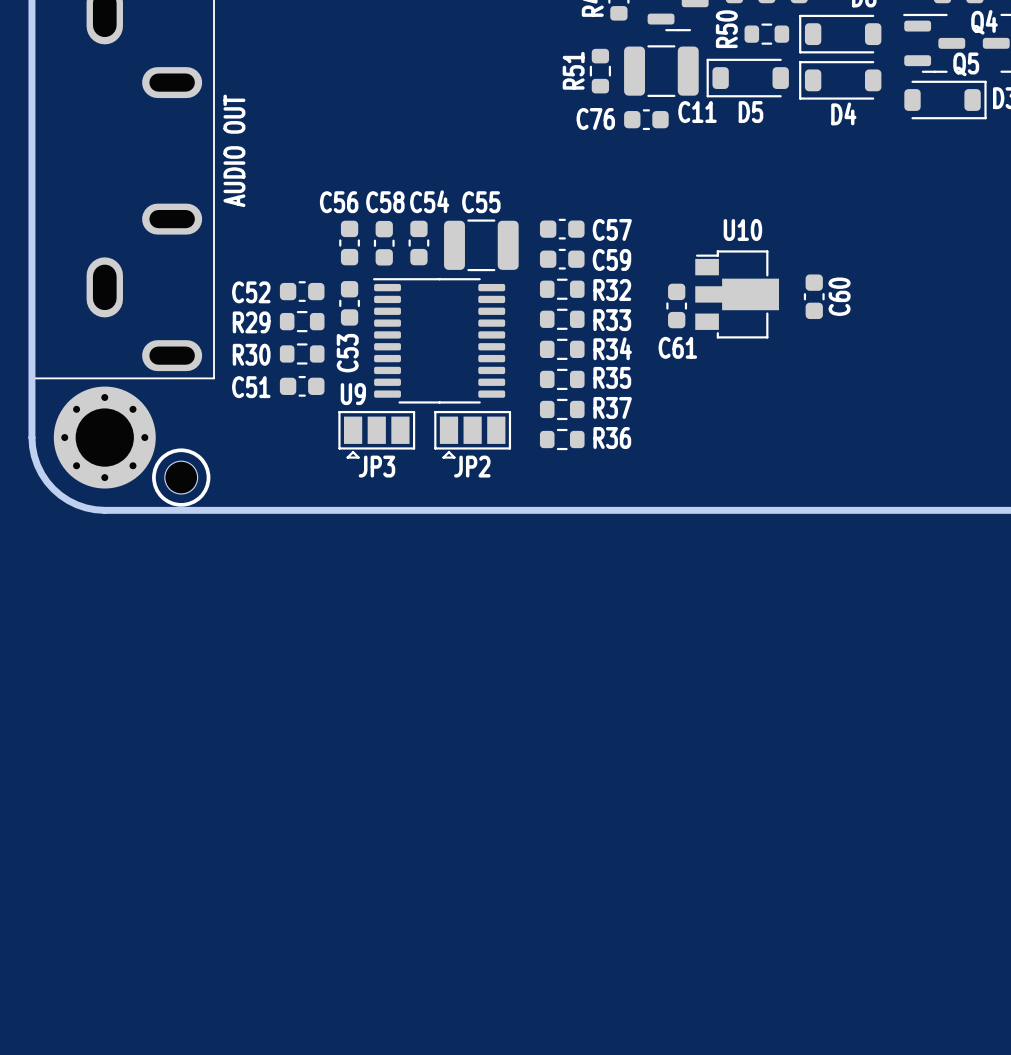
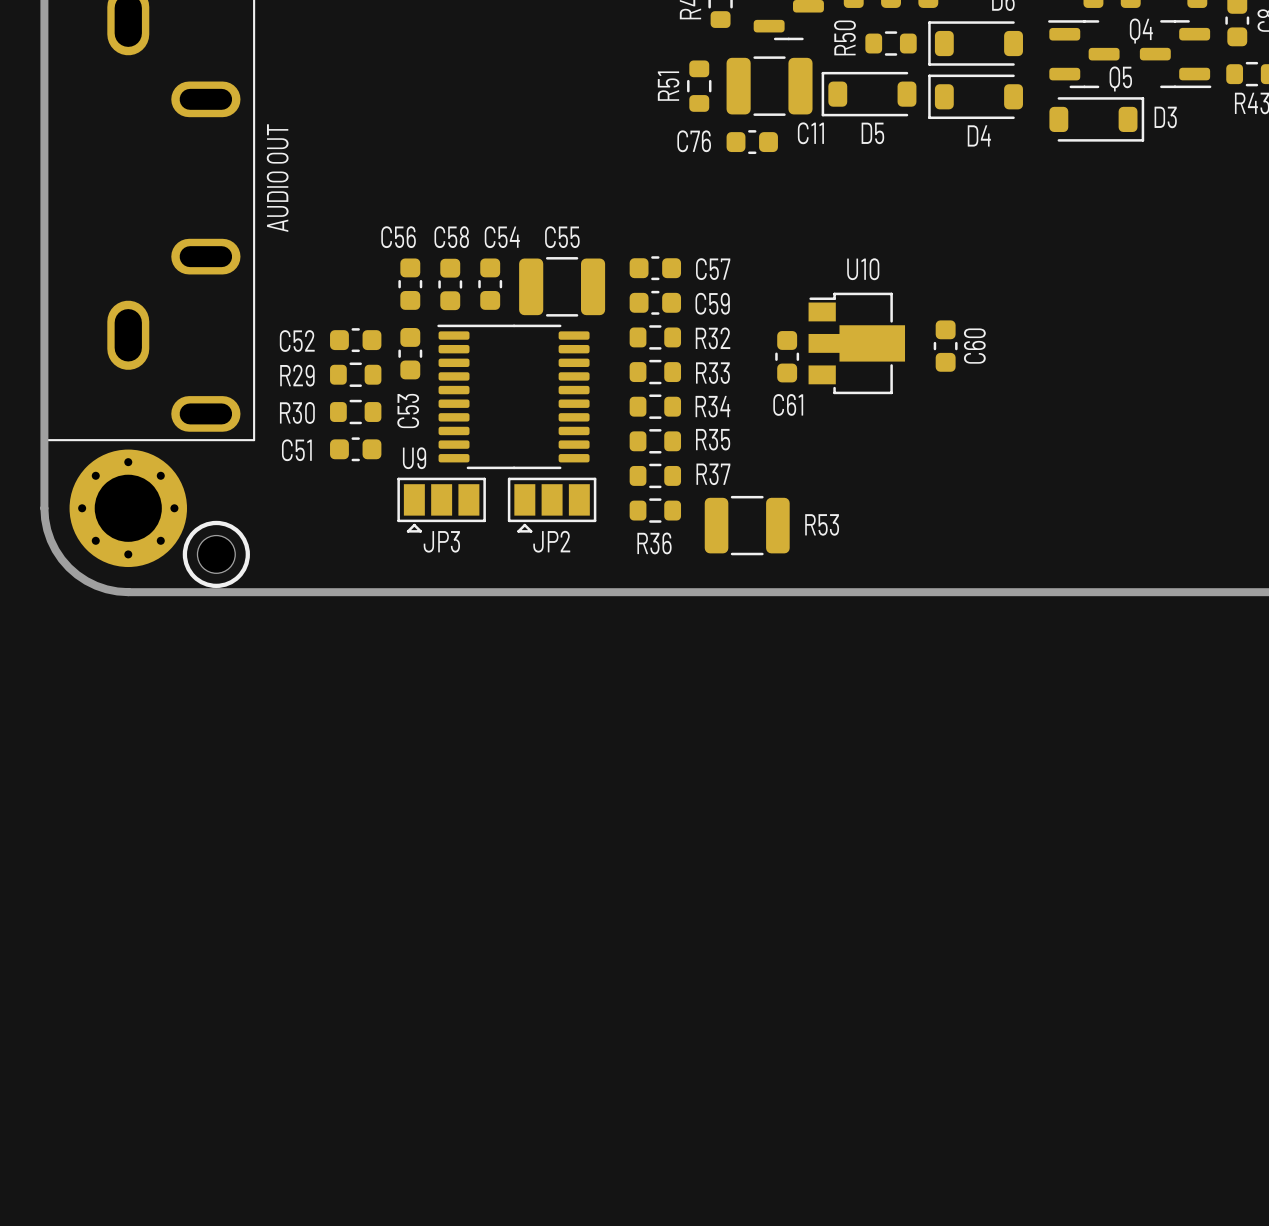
R36 name position: R36 (612, 438) -> R36 (654, 543)
R53: none -> (747, 525)

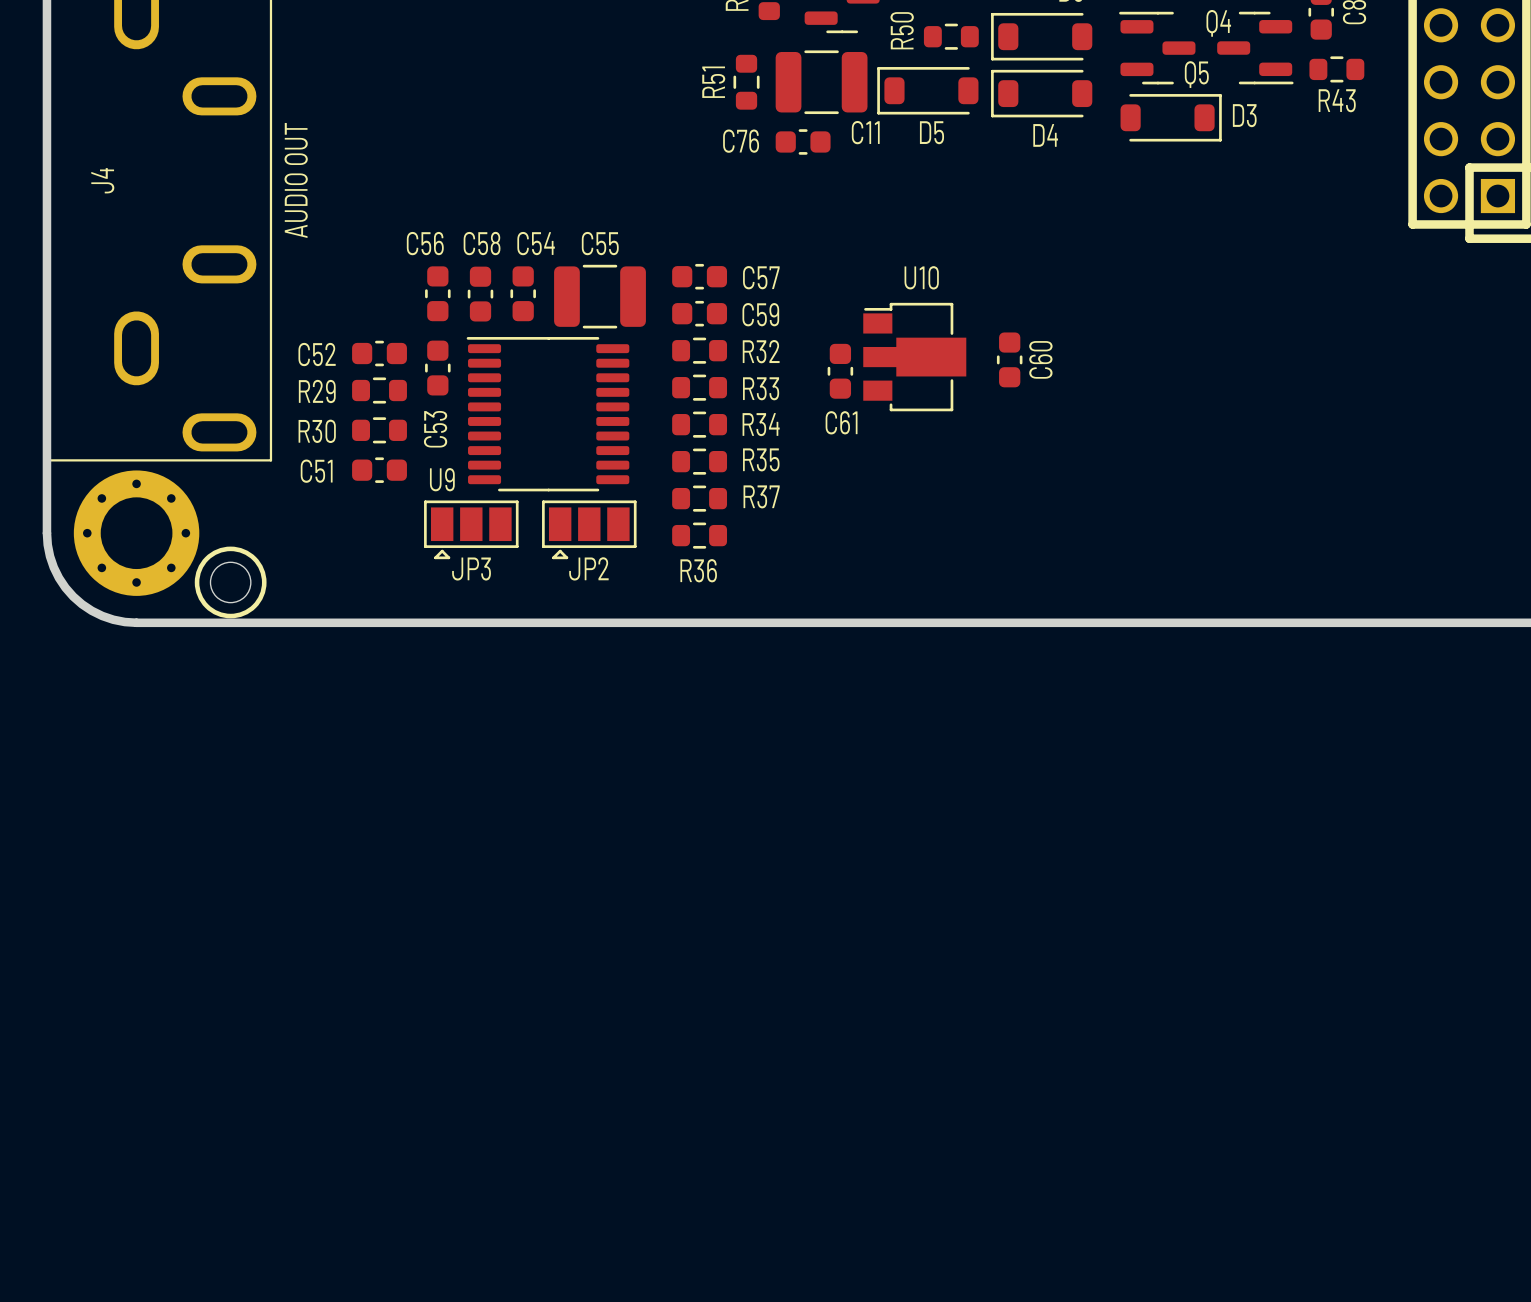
J4 name: none -> J4 (102, 180)
R53: (747, 525) -> none

